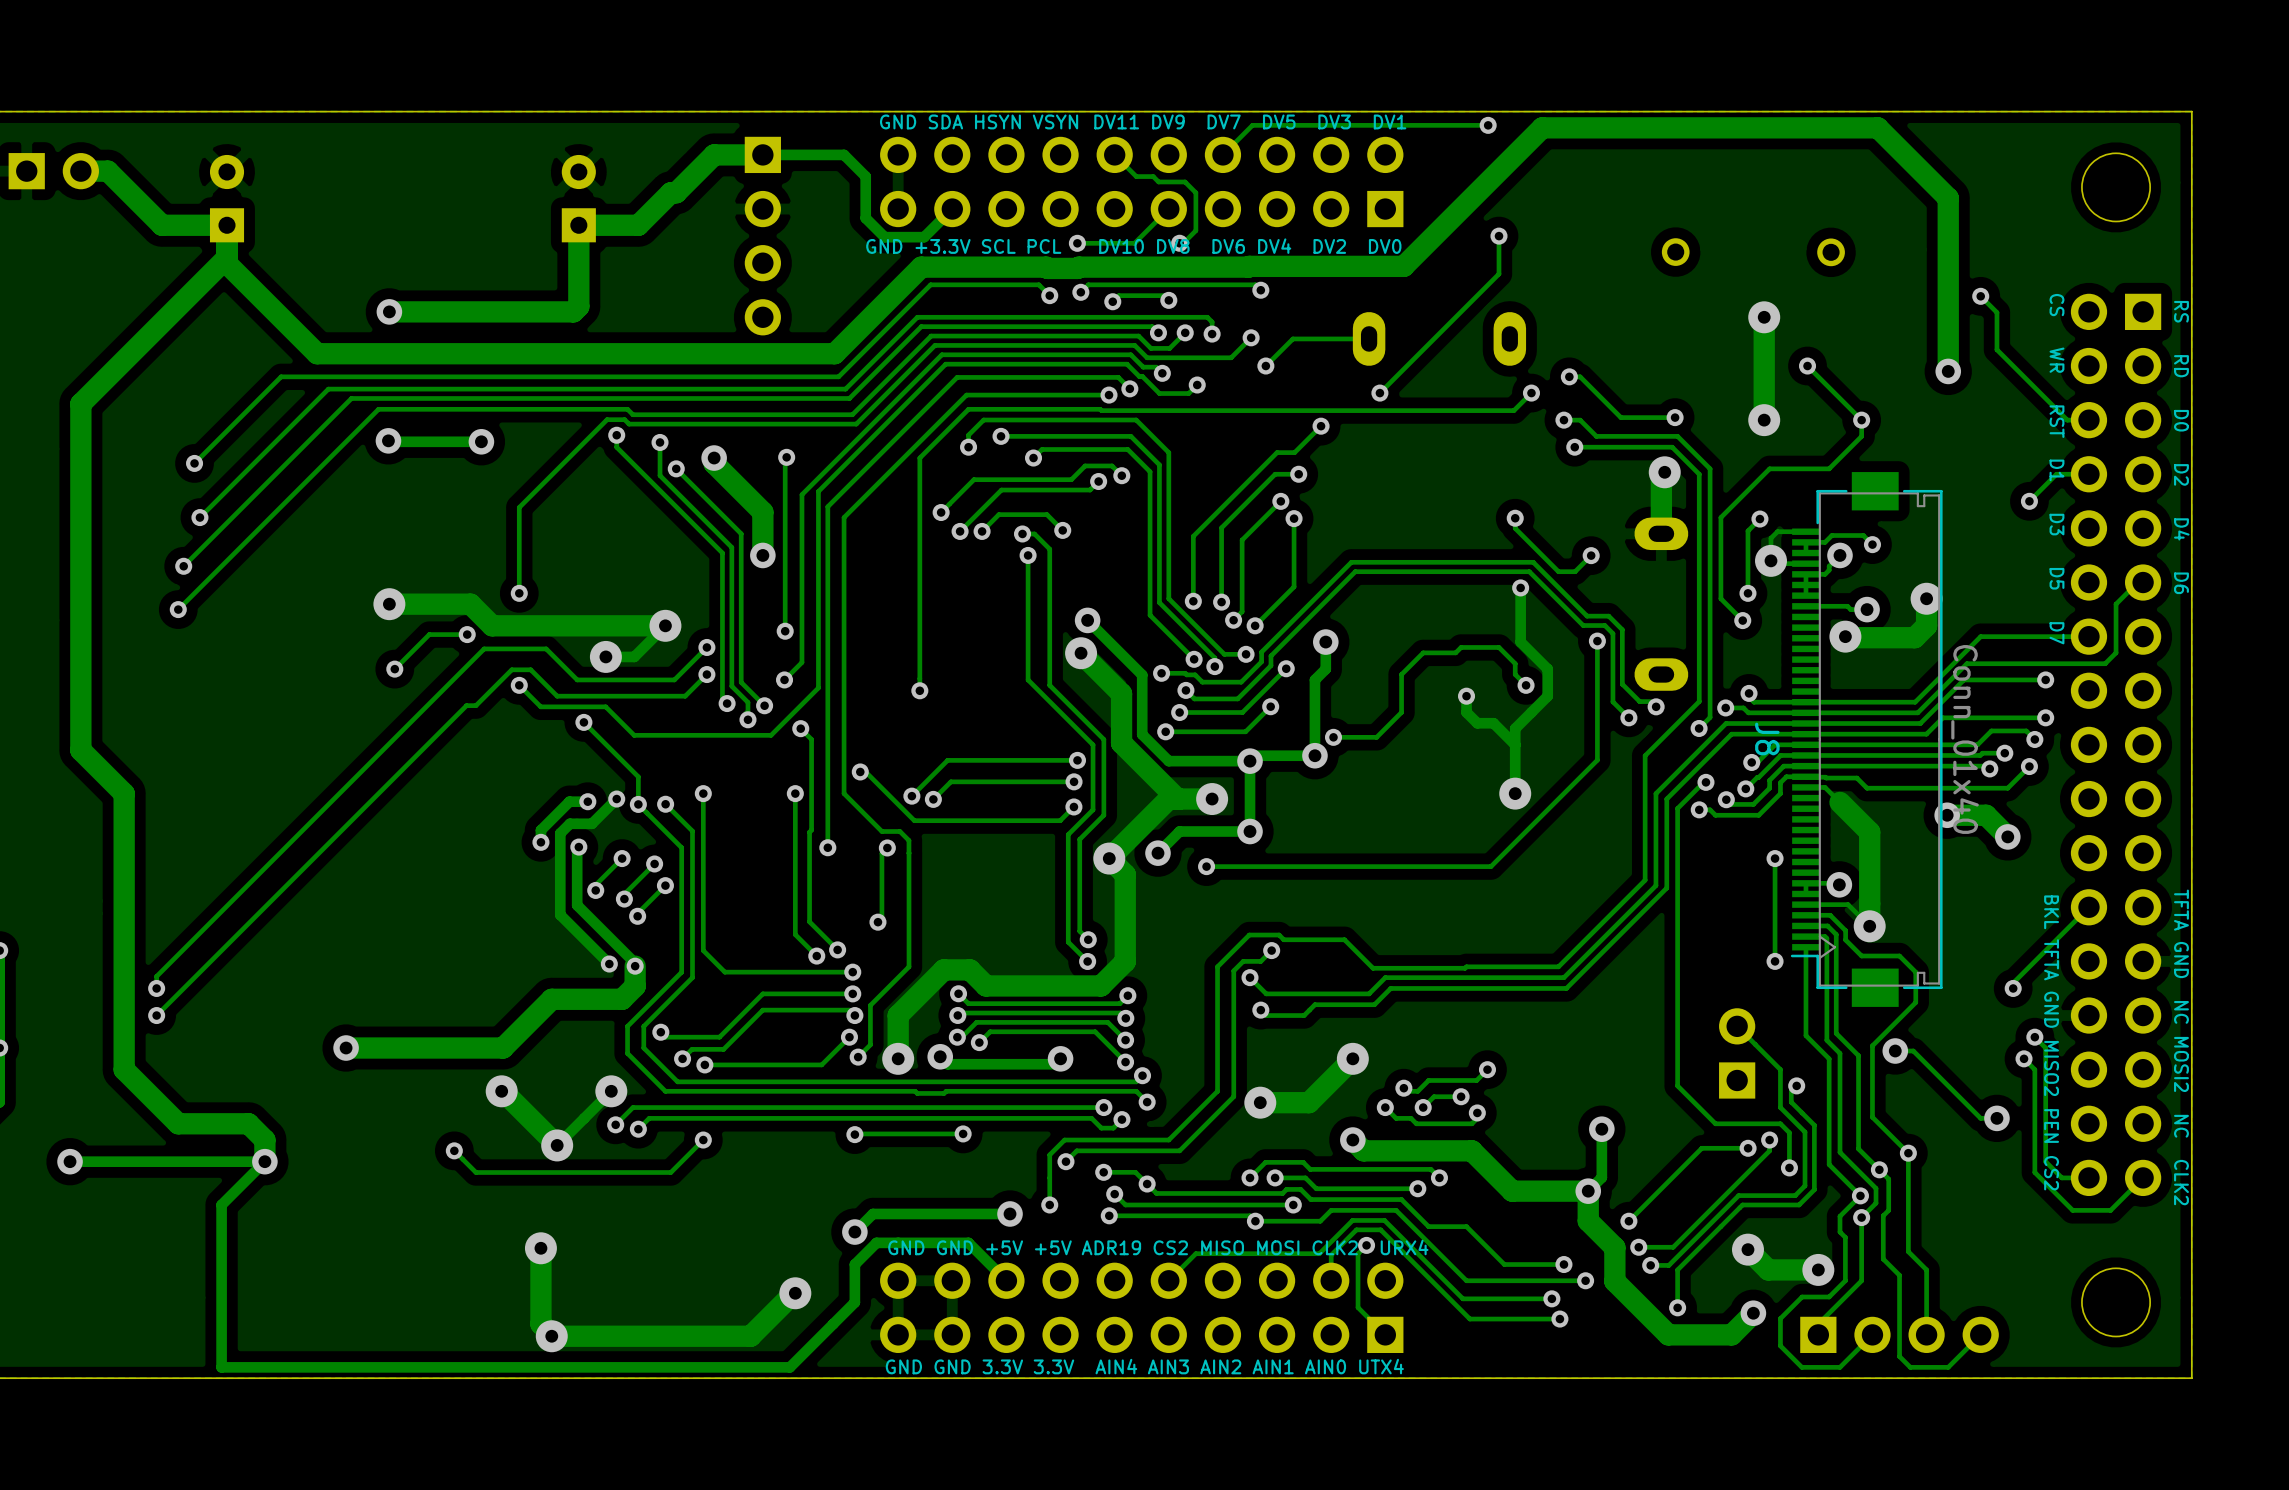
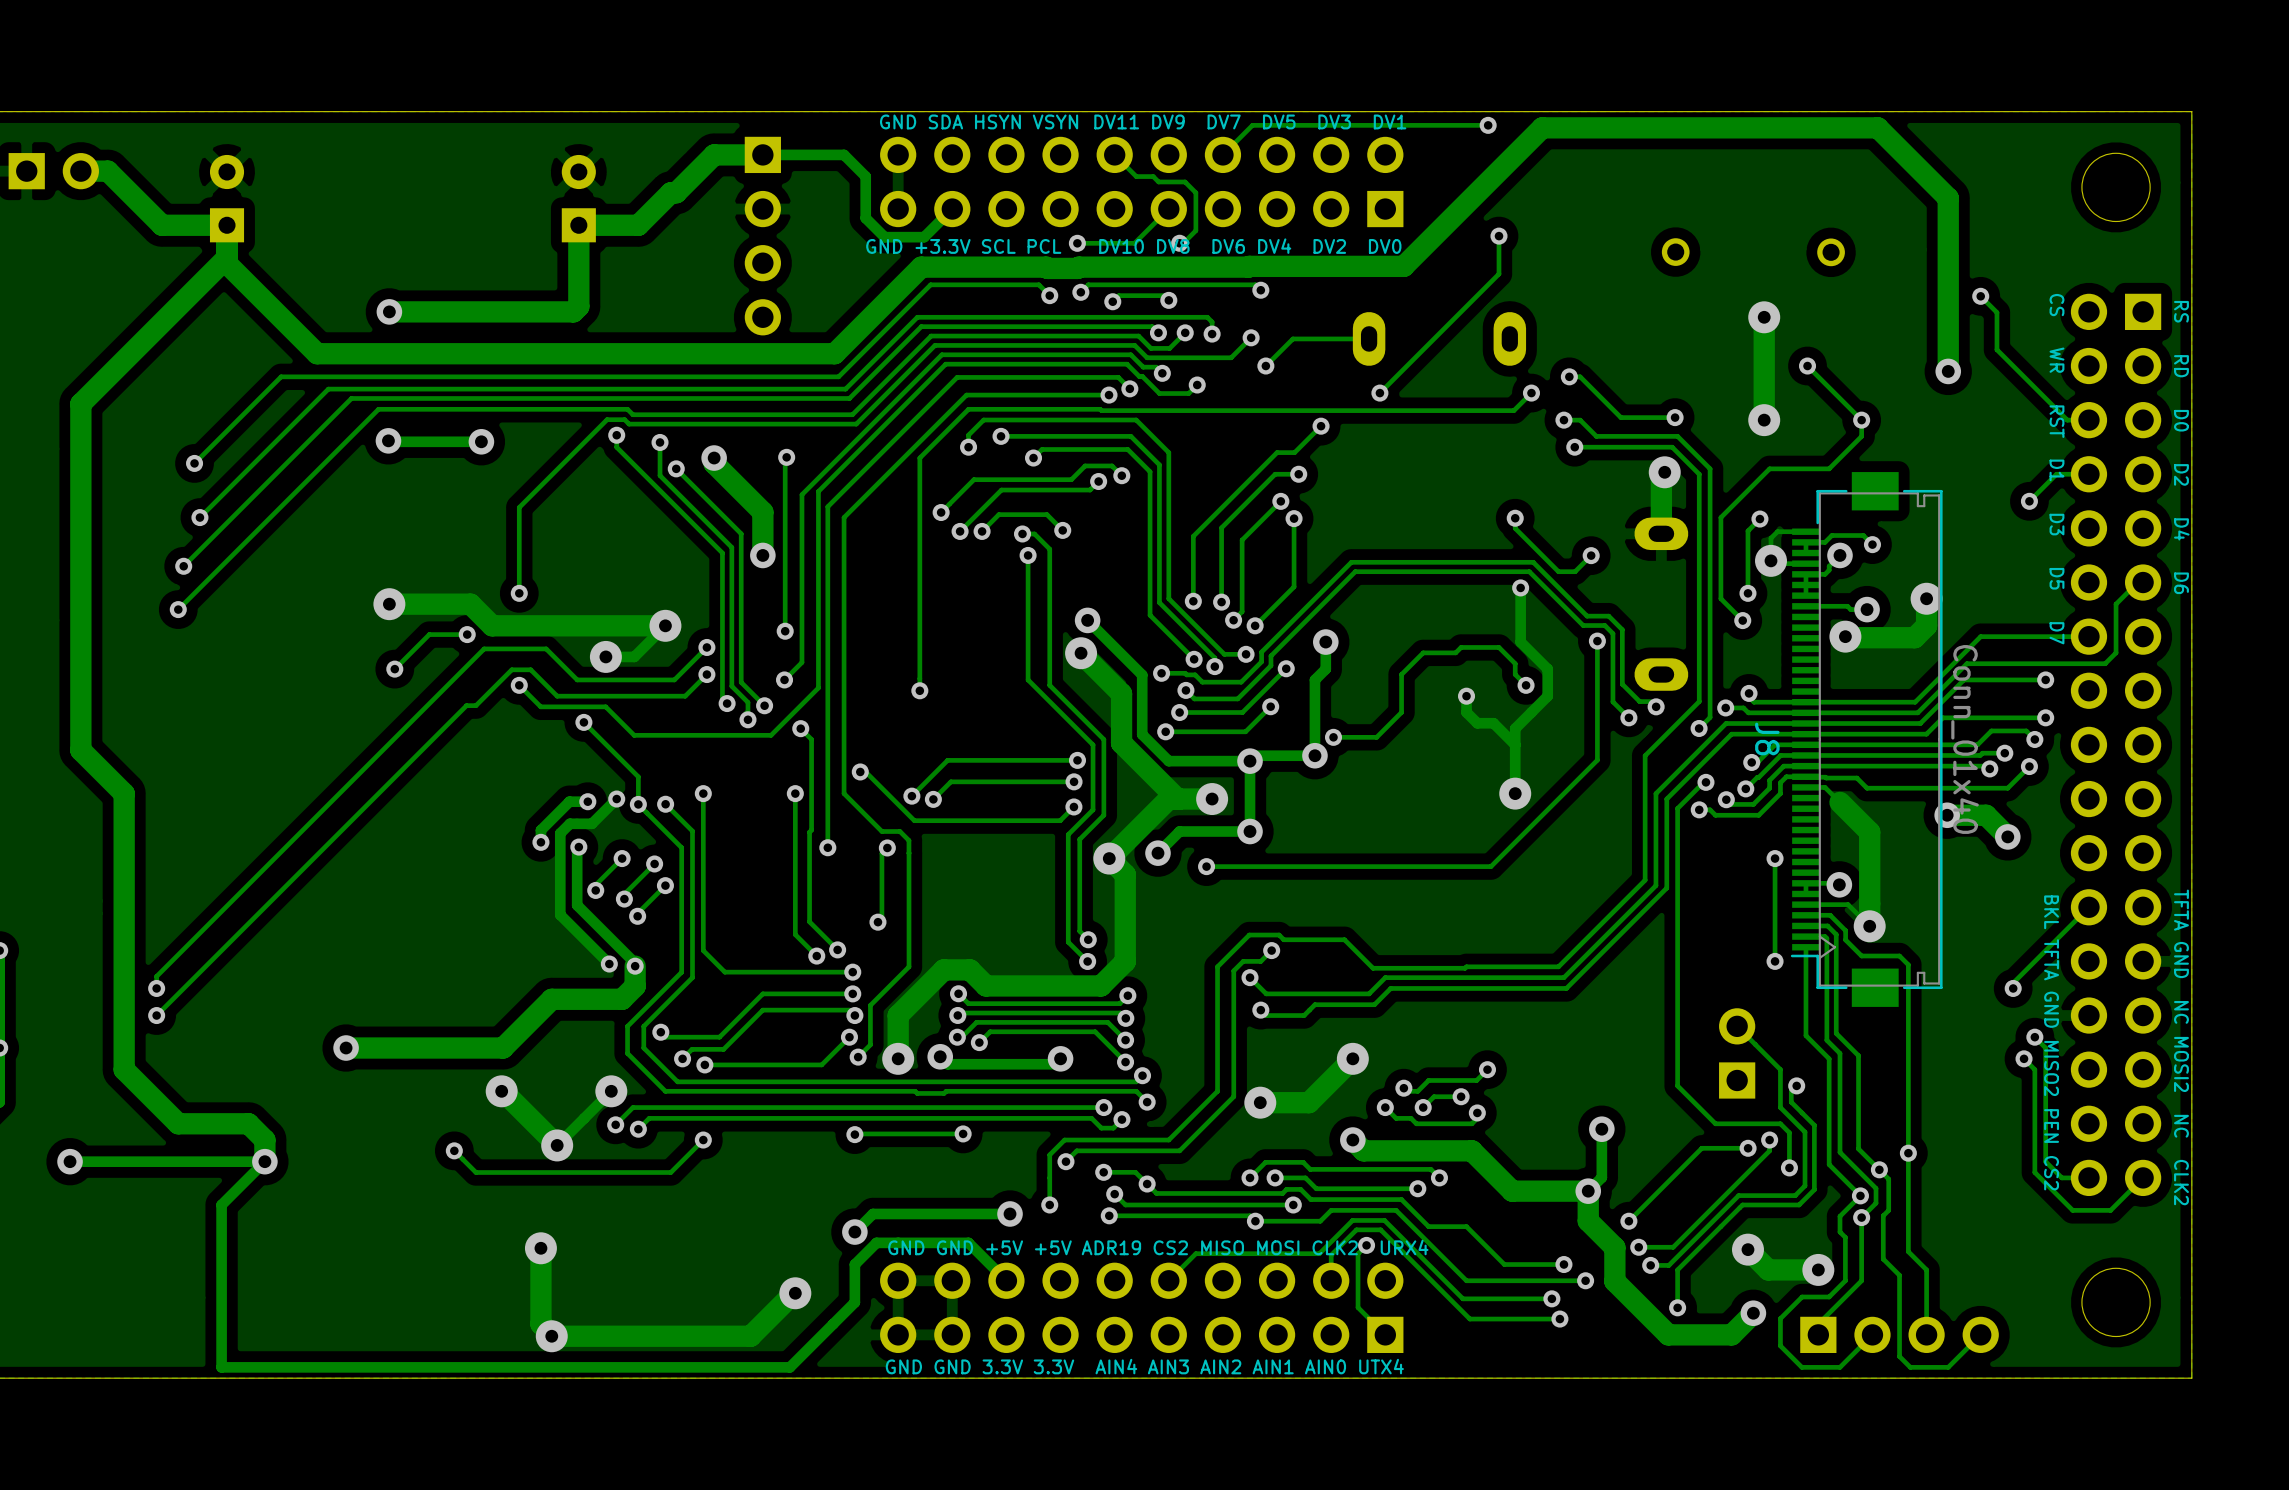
track: (1908, 964) (1915, 972) (1915, 1002) (1872, 1045) (1872, 1117) (1908, 1153) -> (1908, 964) (1908, 1153)
track: (1895, 1051) (1913, 1051) (1980, 1118) (1996, 1118) -> none
via: (1895, 1051) -> none
via: (1996, 1118) -> none

